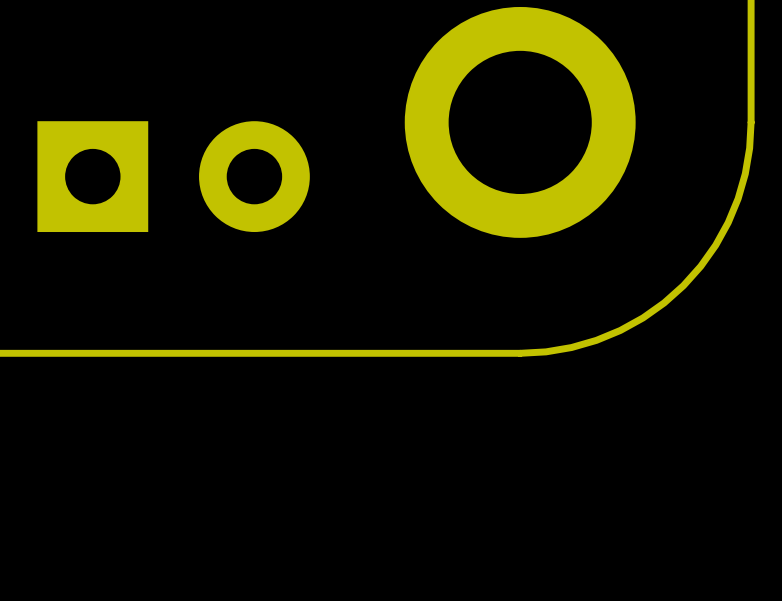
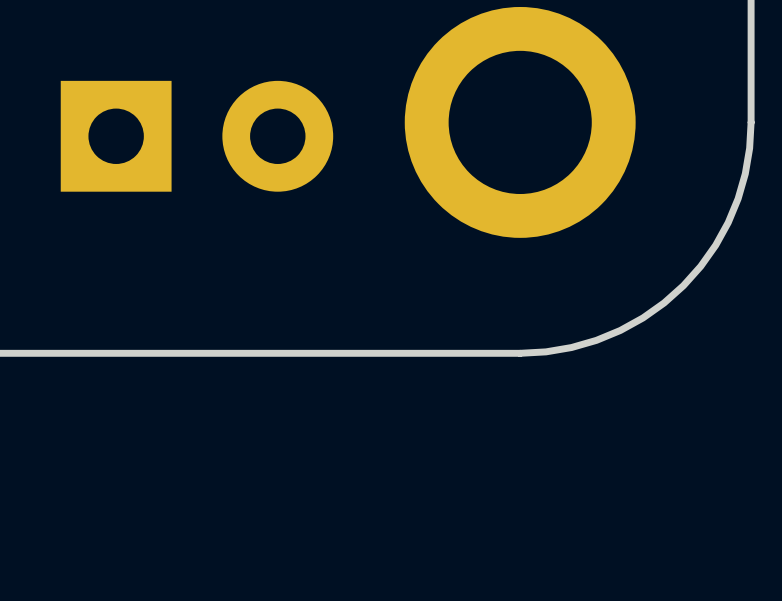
part position: (173, 176) -> (196, 136)

